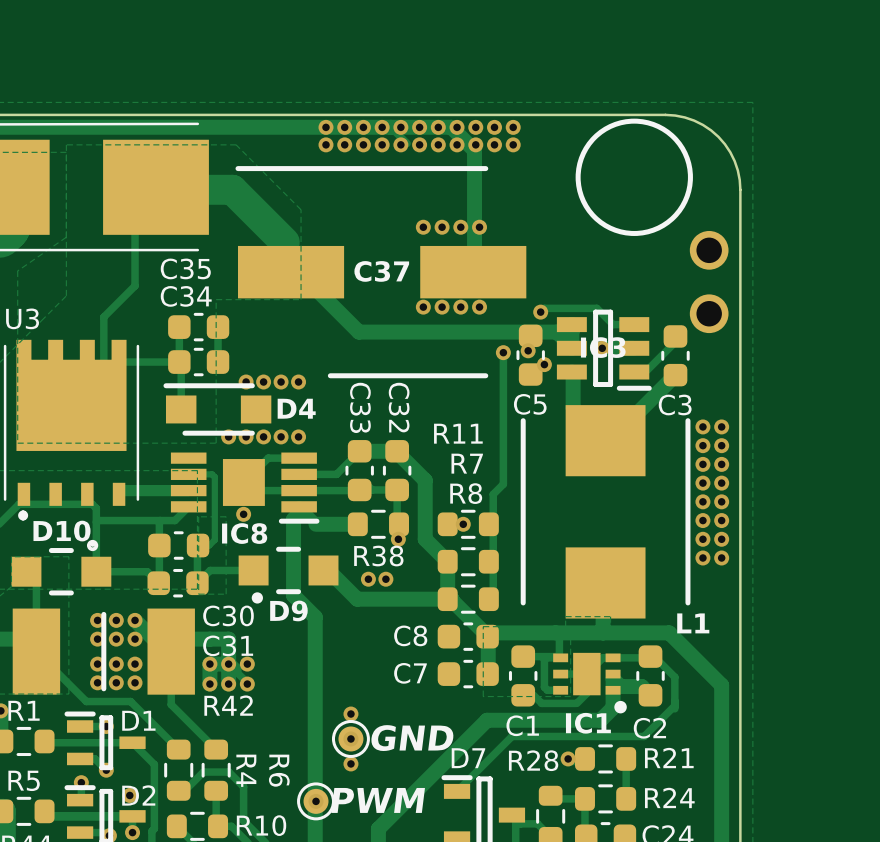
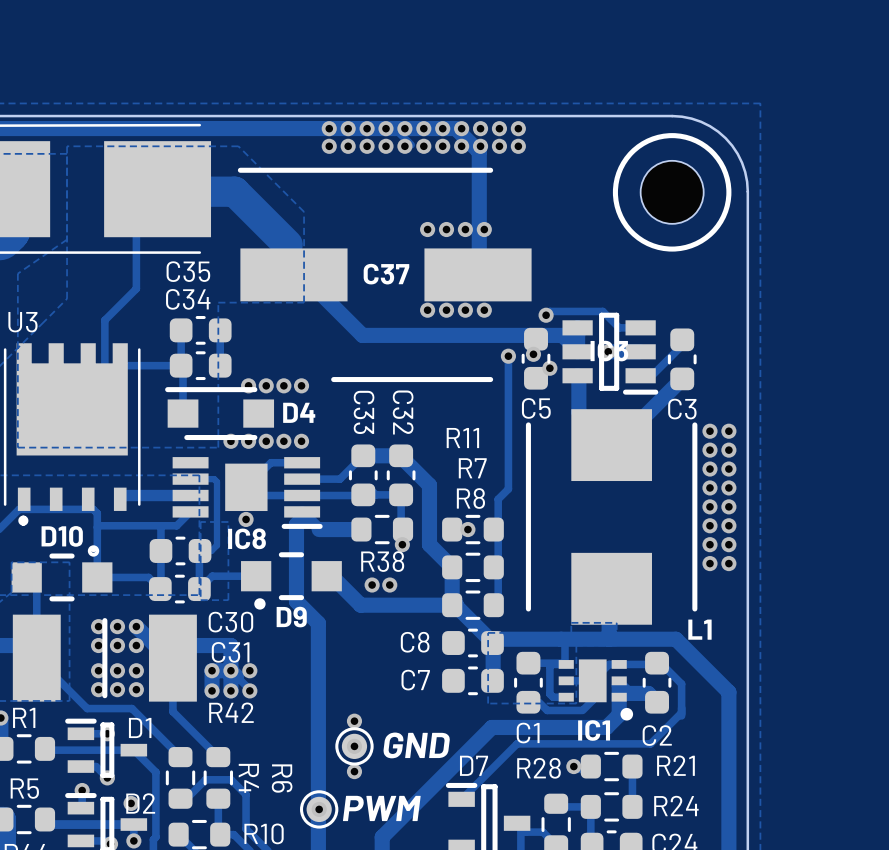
drawing position: (634, 177) -> (672, 192)
part: none -> (672, 192)
part: (709, 282) -> none

